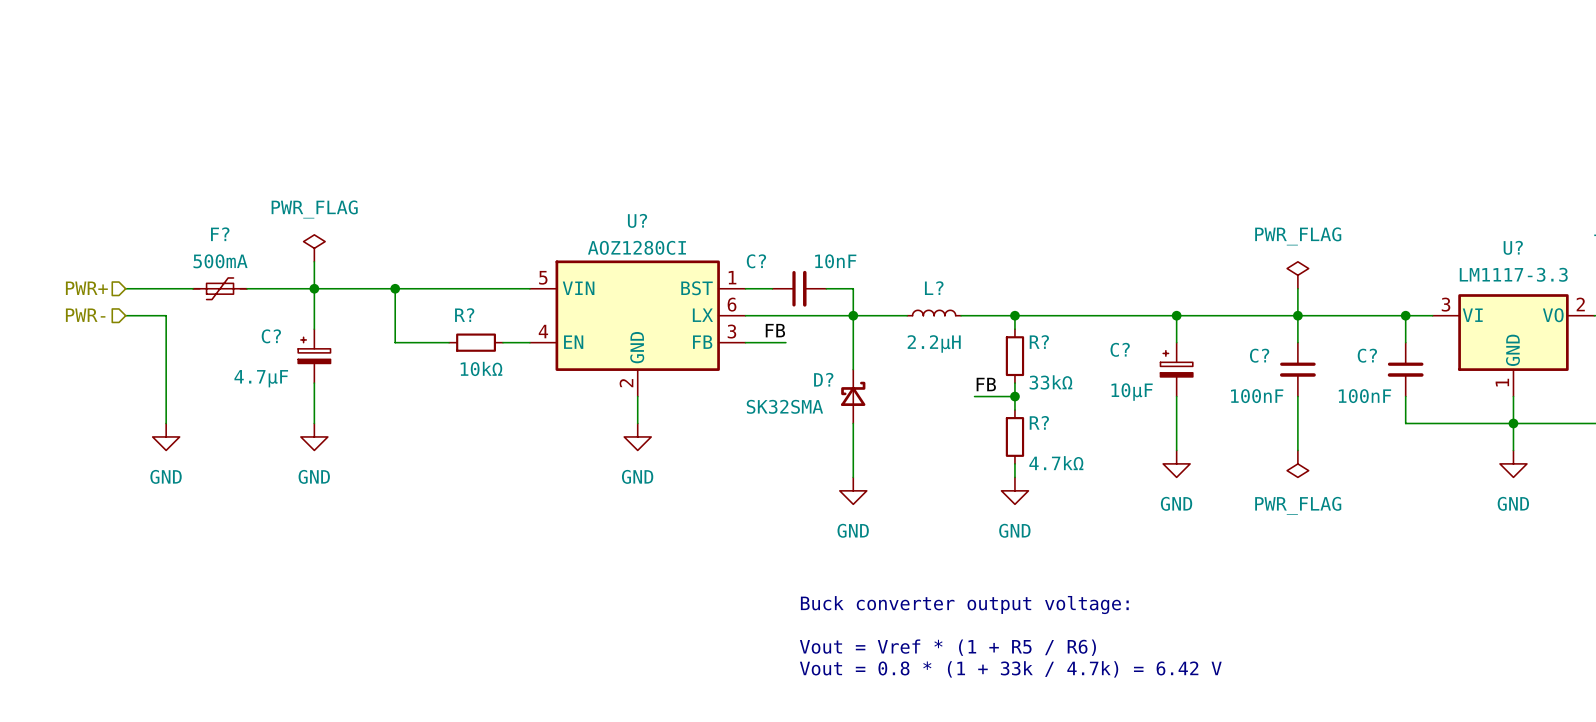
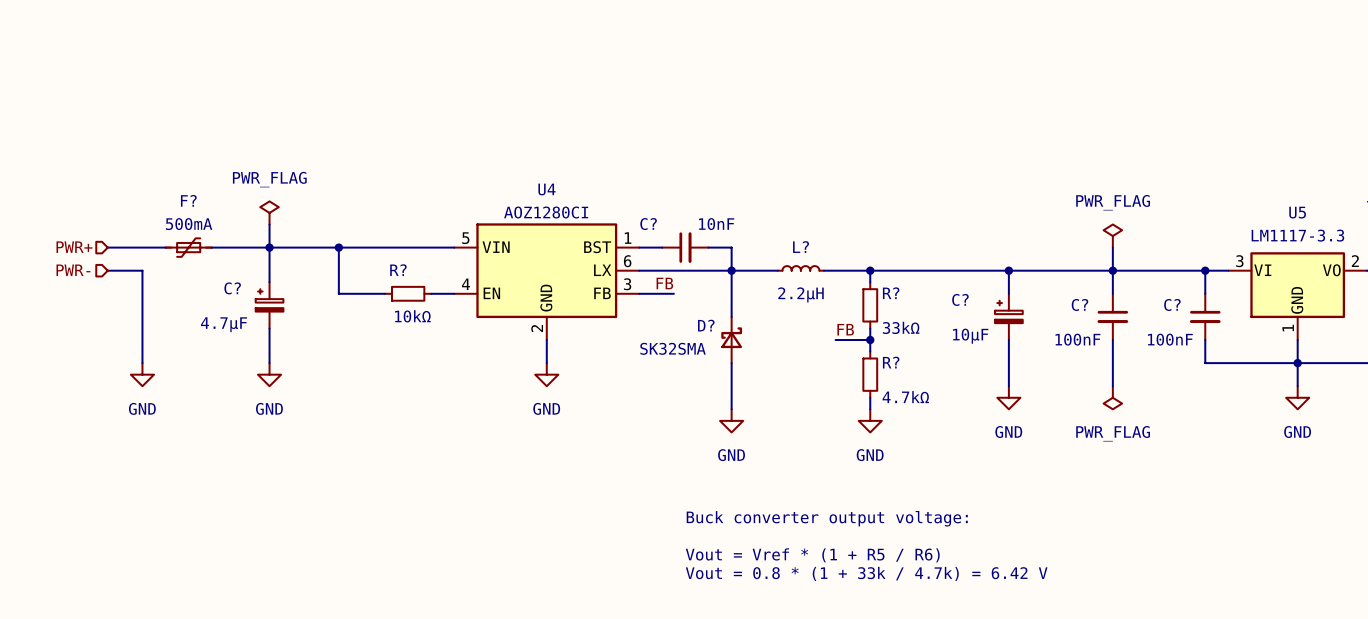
U? name: U? (637, 220) -> U4 (546, 189)
U? name: U? (1513, 247) -> U5 (1297, 212)

